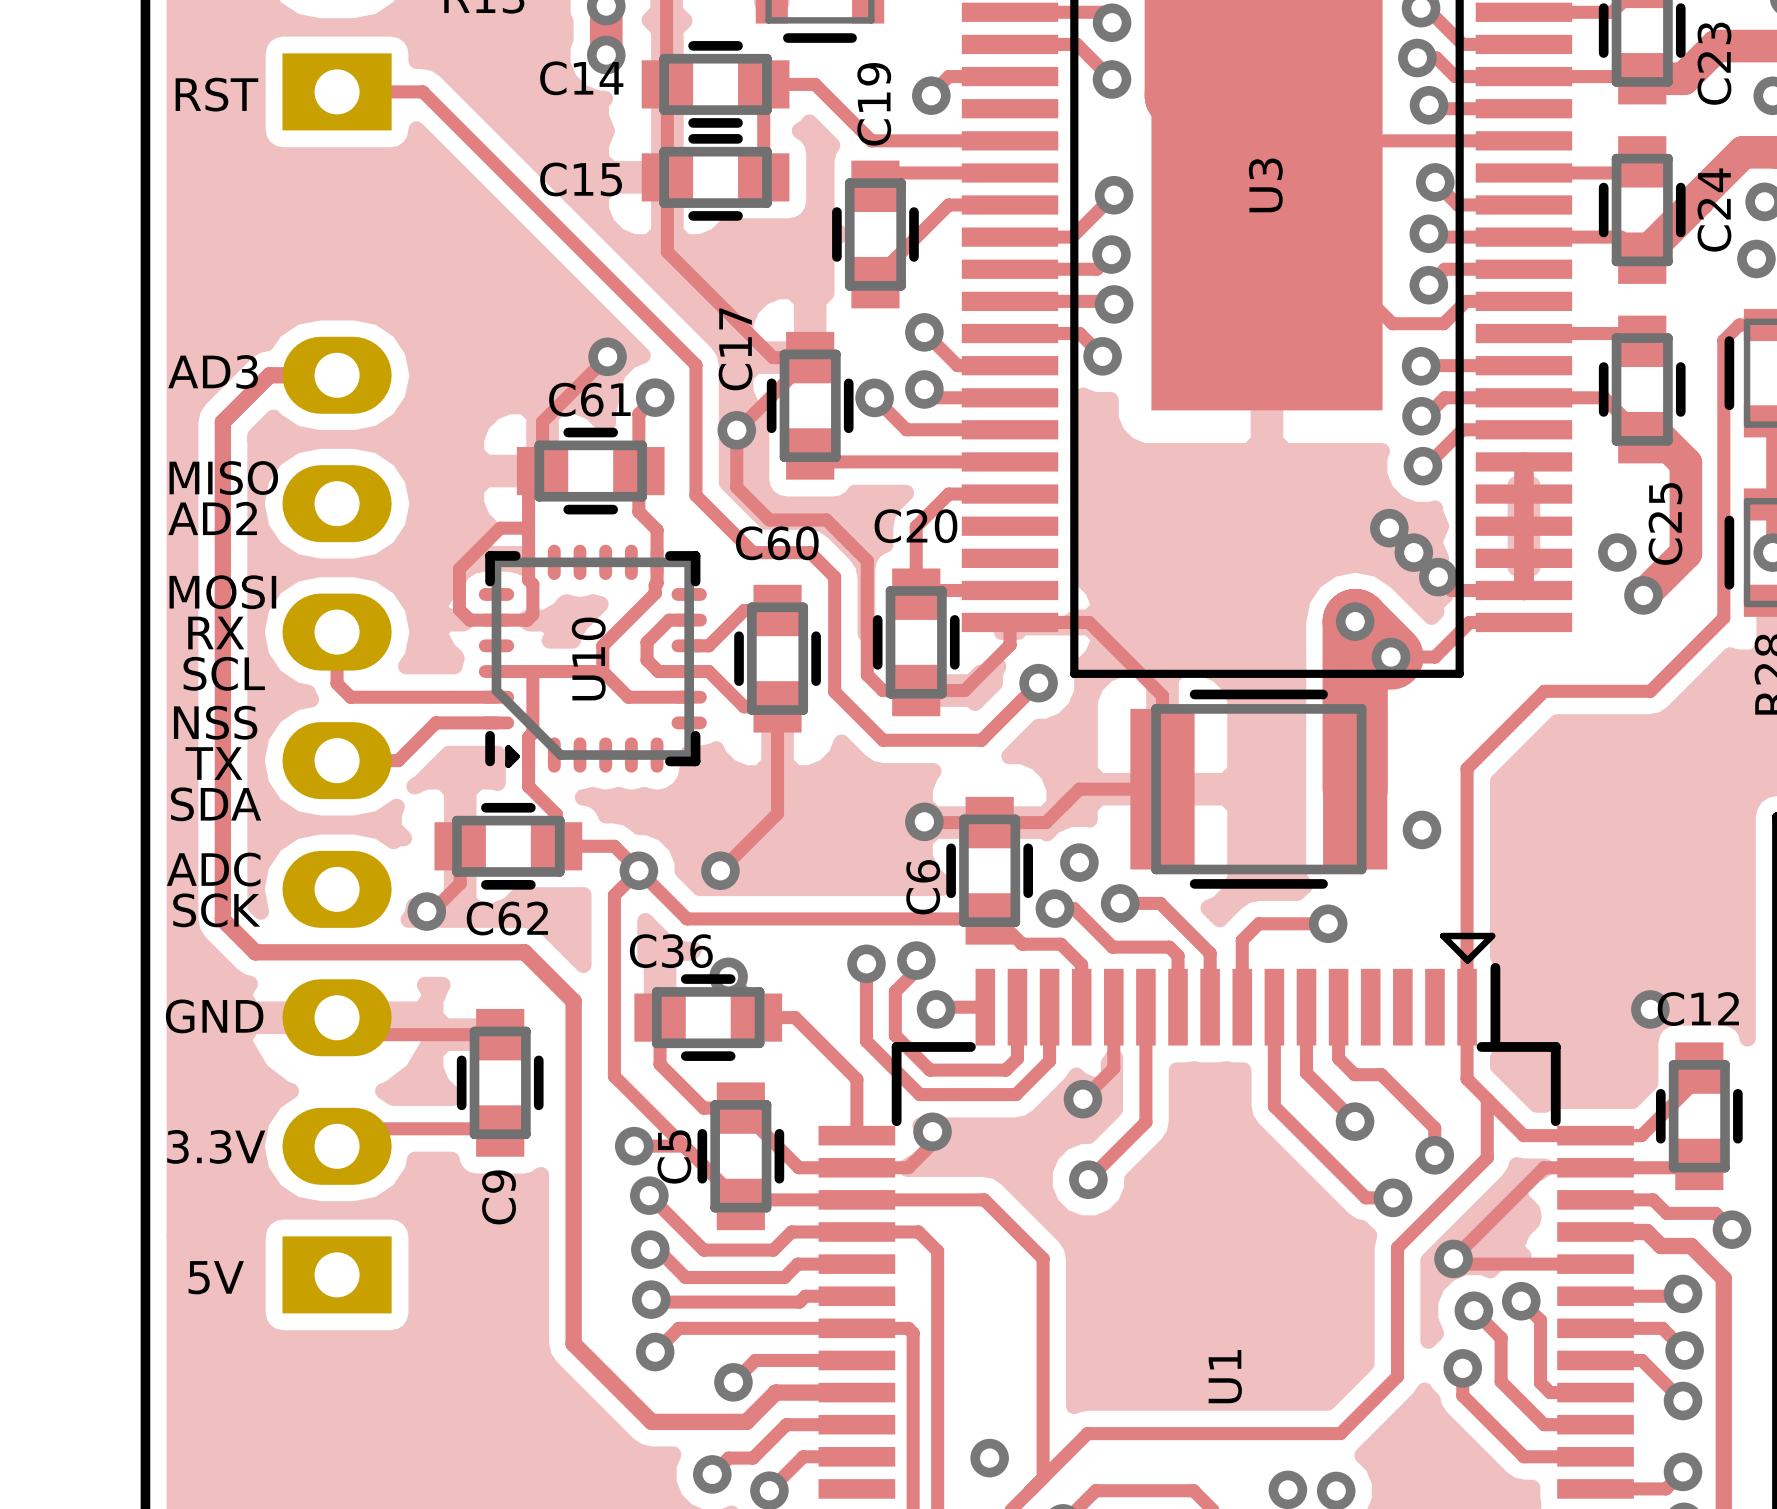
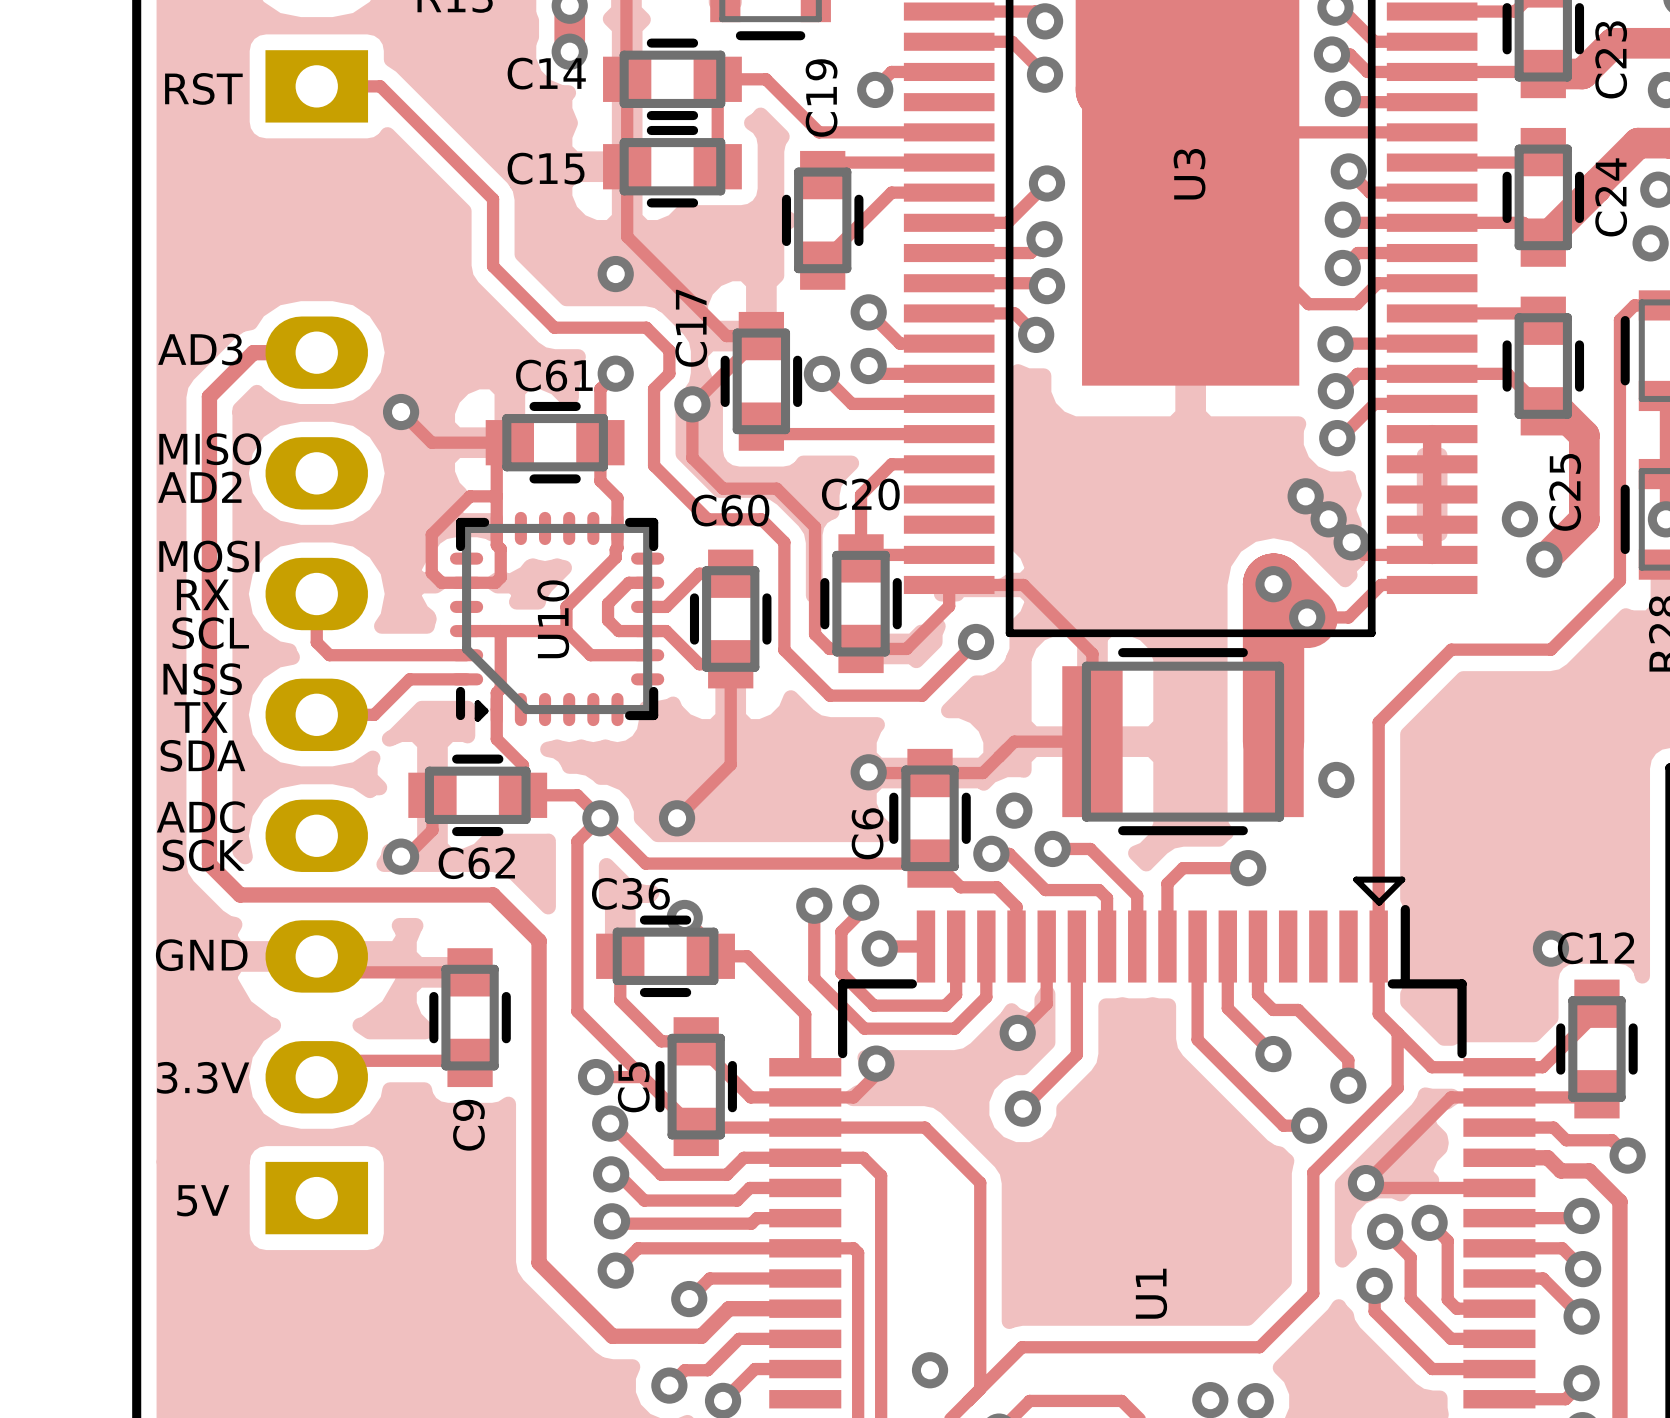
track: (404, 91) (422, 91) (695, 365) (695, 413) -> (380, 86) (493, 199) (493, 266) (554, 327) (646, 327) (669, 350) (669, 373) (654, 389)
track: (607, 356) (542, 421) (542, 471) -> (401, 412) (431, 442) (509, 442)
via position: (607, 356) -> (615, 274)
via: none -> (401, 412)

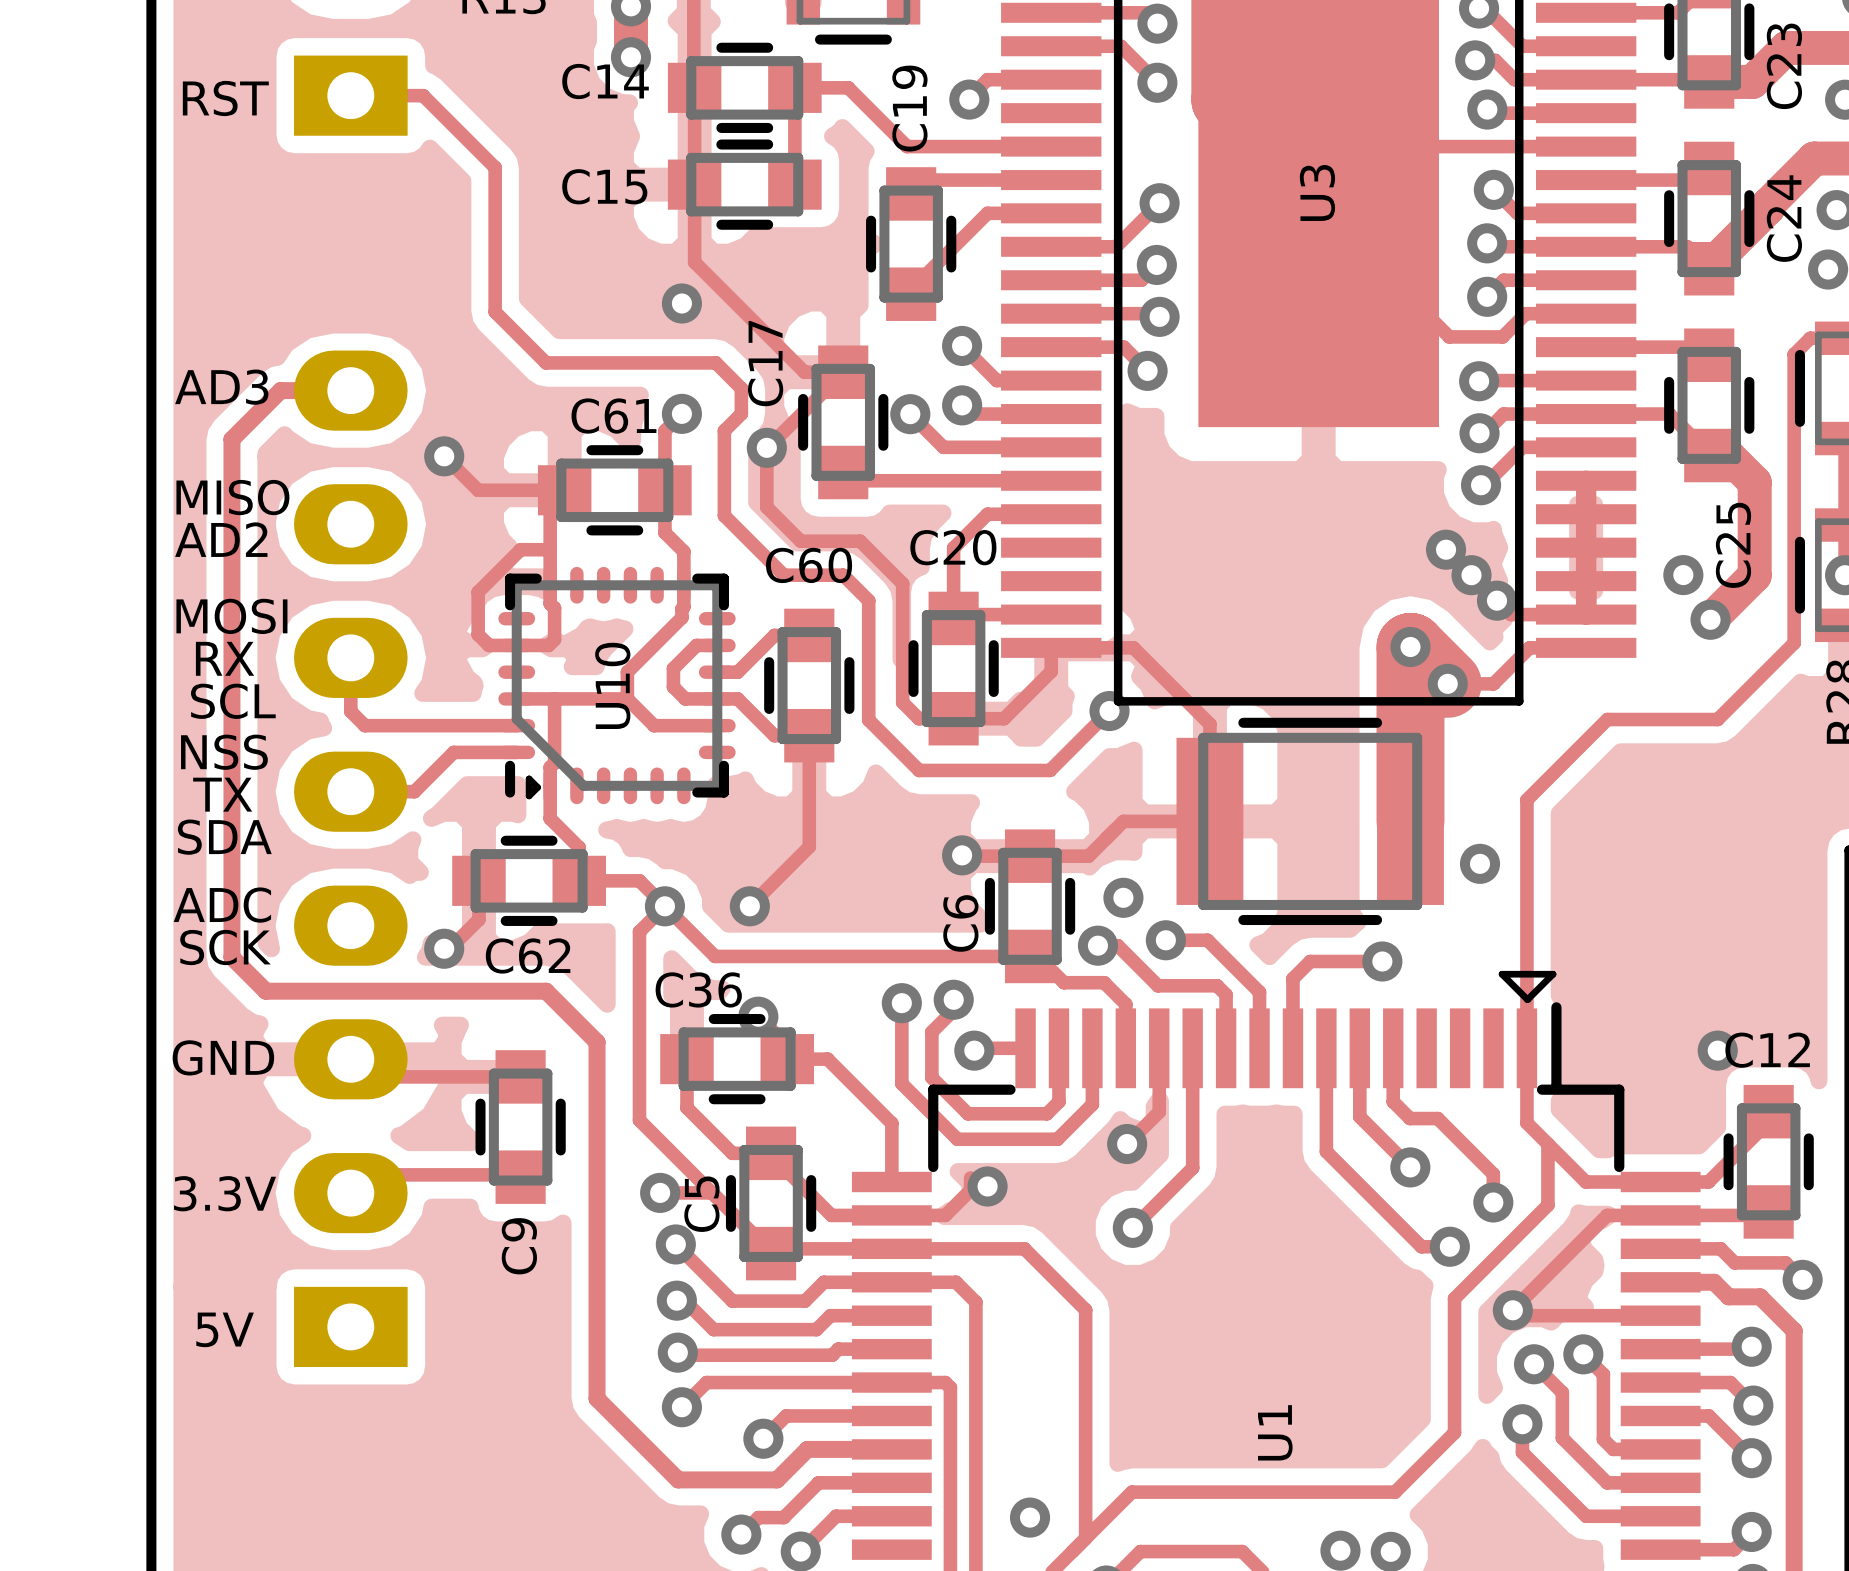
track: (380, 86) (493, 199) (493, 266) (554, 327) -> (421, 95) (495, 167) (495, 311) (546, 362) (614, 362)
track: (976, 641) (922, 695) -> (1109, 711) (1050, 770) (1021, 770)
via position: (976, 641) -> (1109, 711)
via position: (876, 1063) -> (987, 1186)

